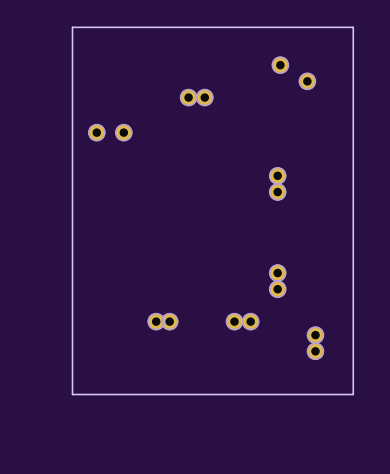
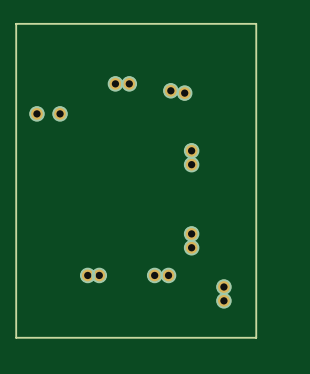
part: (280, 65) -> none
part: (307, 81) -> none
part: none -> (170, 90)
part: none -> (184, 93)

